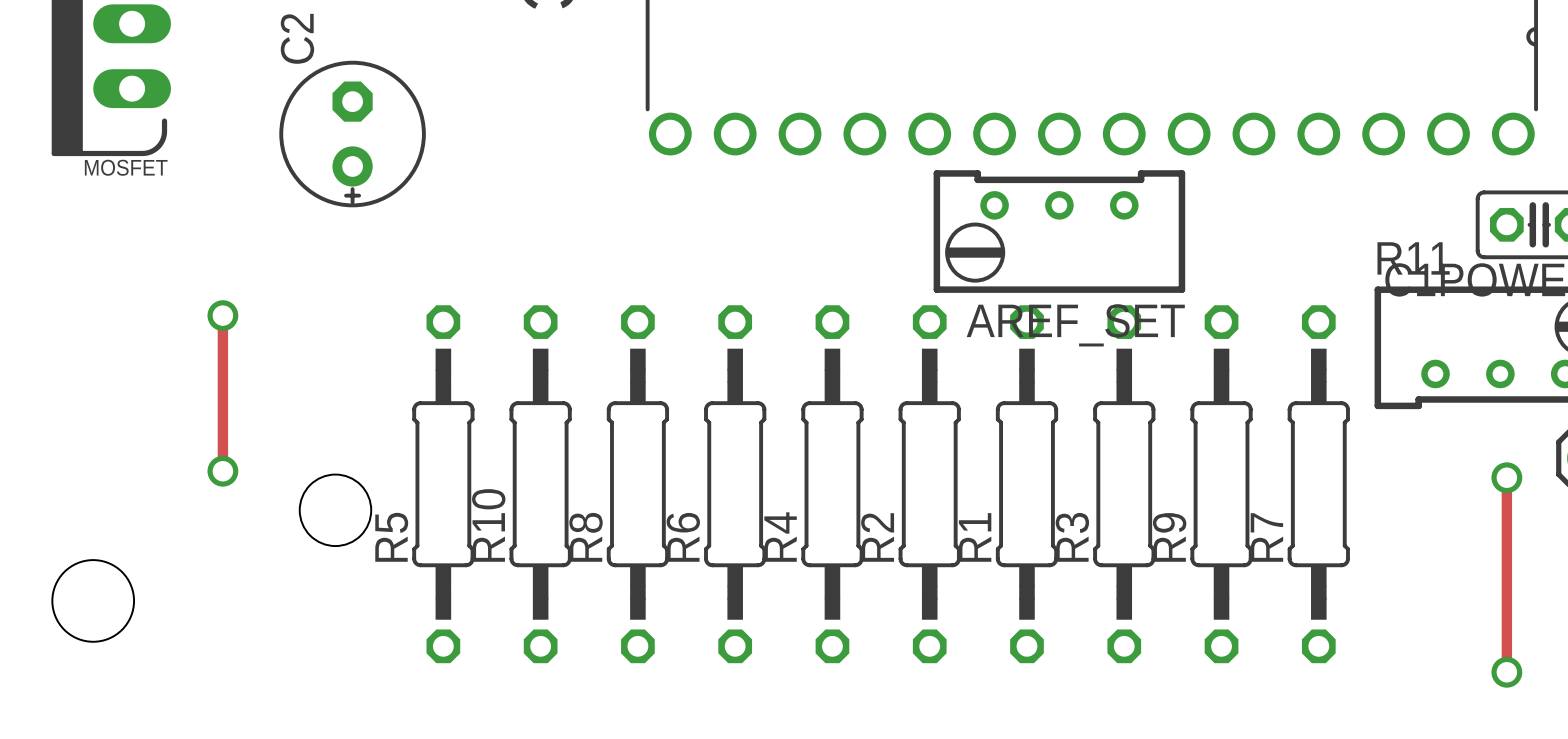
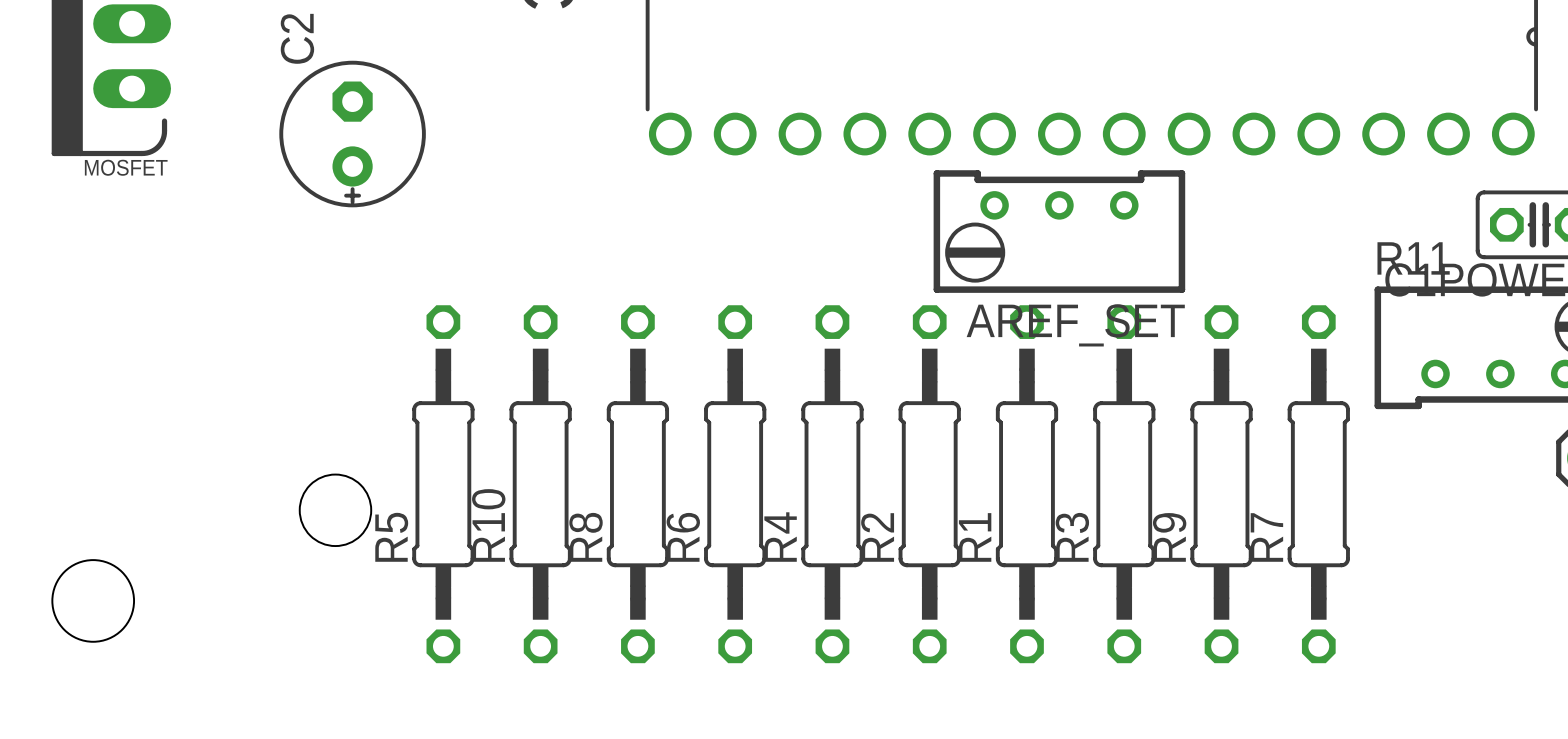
track: (222, 315) (222, 471) -> none
via: (222, 315) -> none
via: (222, 471) -> none
track: (1506, 477) (1506, 672) -> none
via: (1506, 477) -> none
via: (1506, 672) -> none

